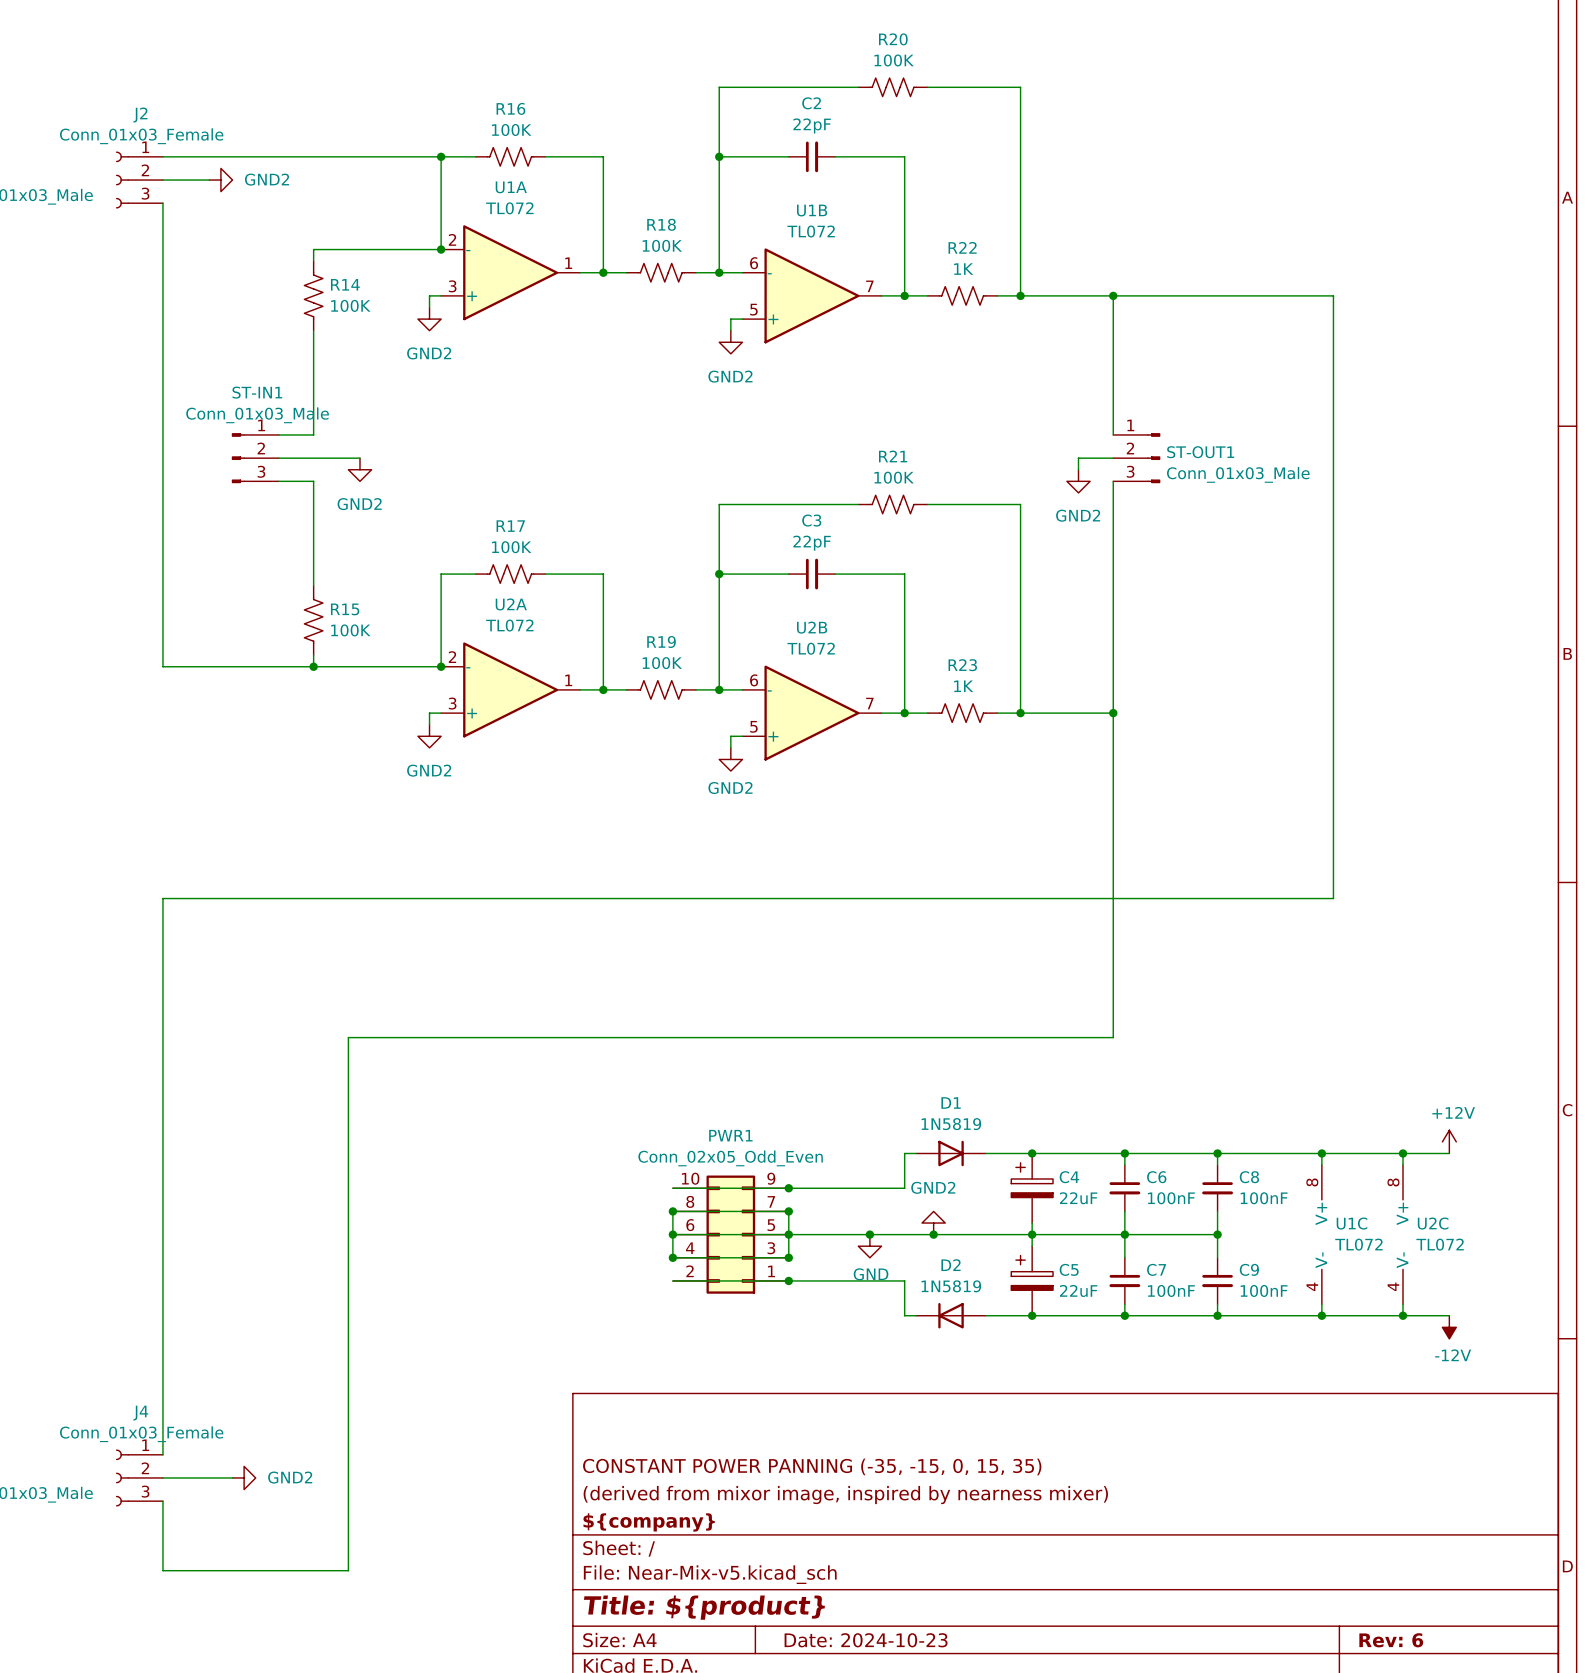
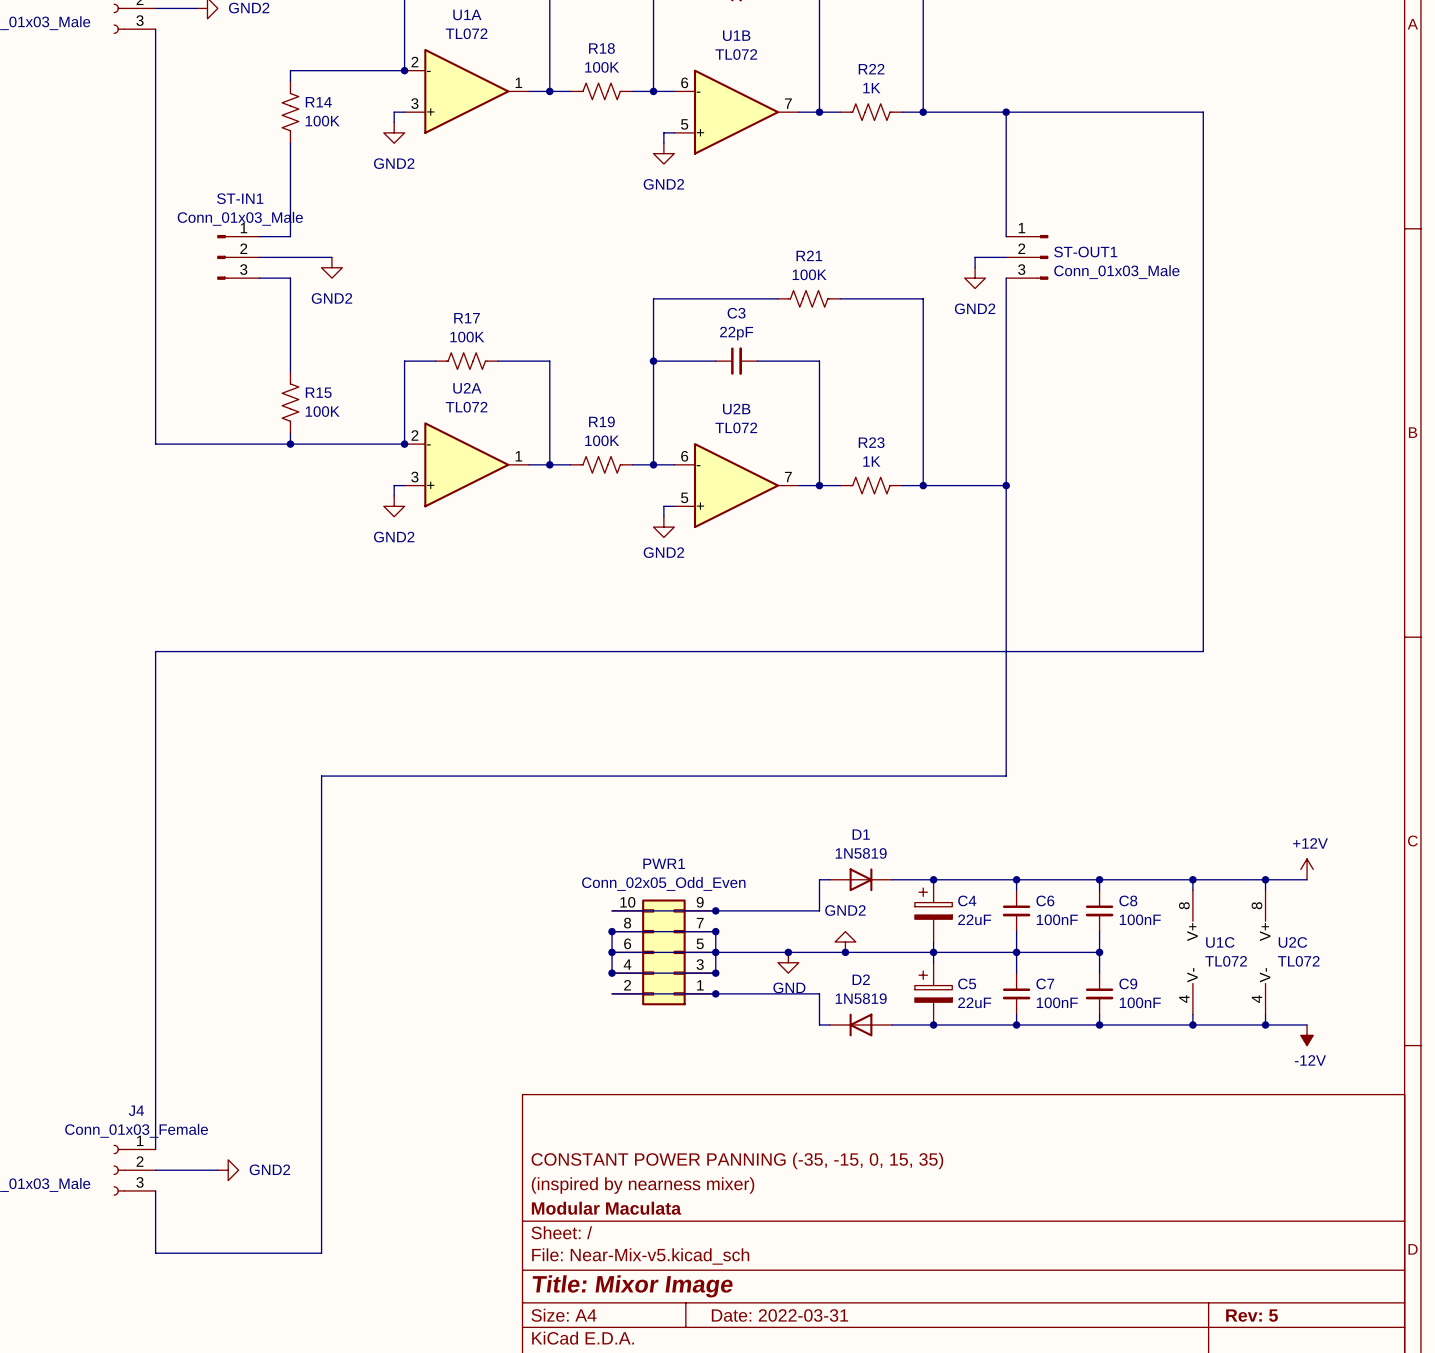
title block: (derived from mixor image, inspired by nearness mixer) (845, 1495) -> (inspired by nearness mixer) (643, 1185)
title block: ${company} (649, 1522) -> Modular Maculata (606, 1208)
title block: Title: ${product} (704, 1607) -> Title: Mixor Image (632, 1286)
title block: Date: 2024-10-23 (866, 1640) -> Date: 2022-03-31 (779, 1315)
title block: Rev: 6 (1391, 1640) -> Rev: 5 (1252, 1315)

